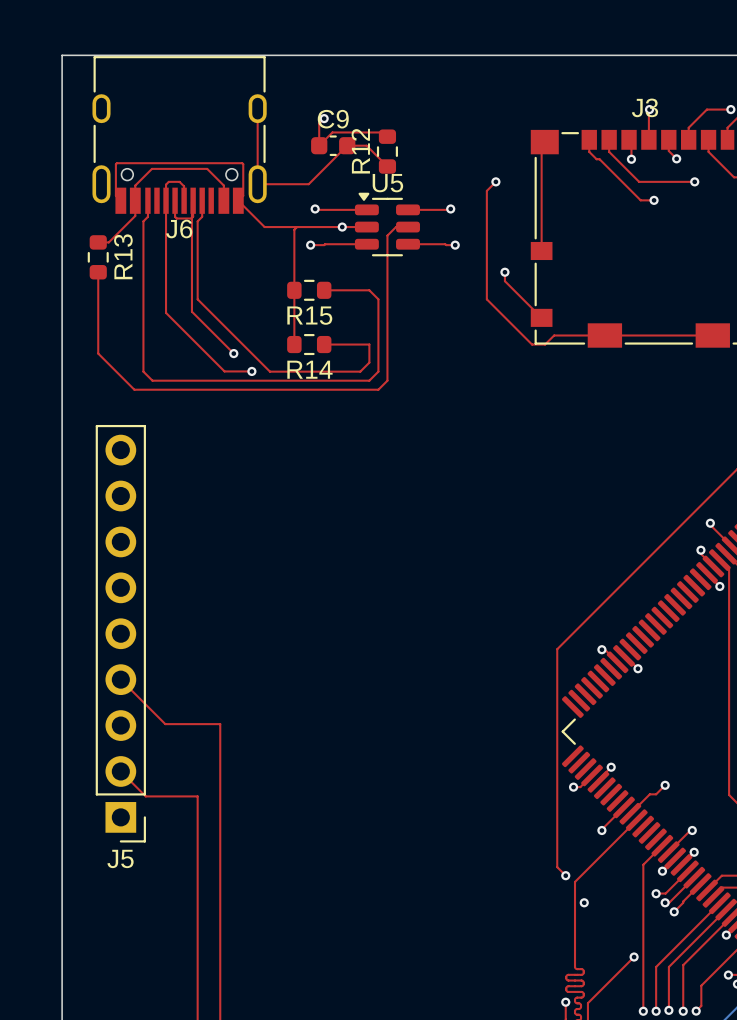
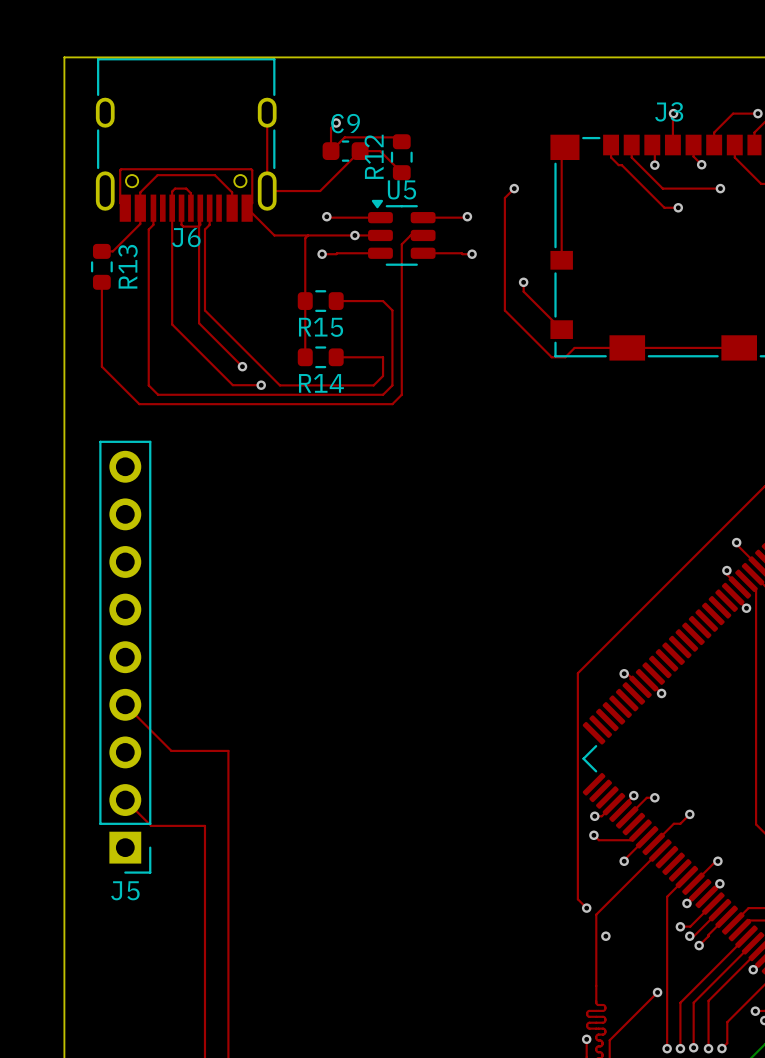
top track: none -> (654, 797) (646, 797) (627, 817)
via: none -> (654, 797)
top track: none -> (640, 830) (630, 840) (598, 840) (593, 835)
via: none -> (593, 835)

